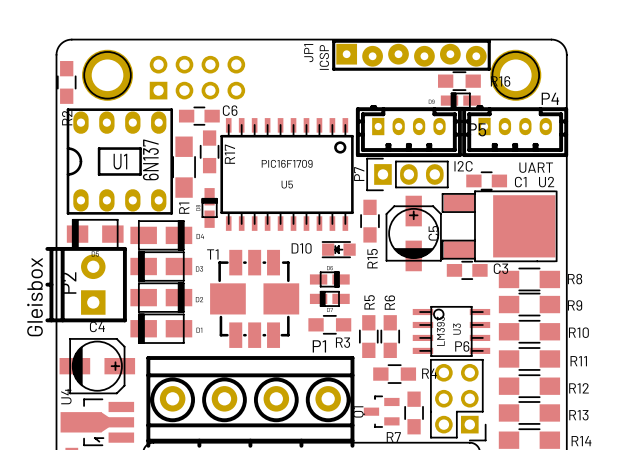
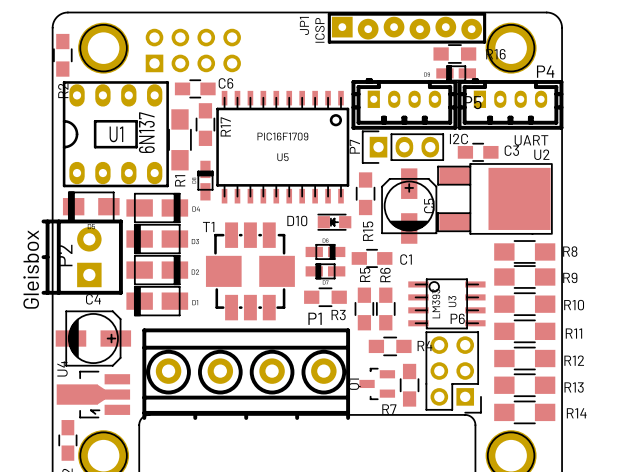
C1 position: (486, 180) -> (372, 258)
C3 position: (467, 270) -> (478, 152)

